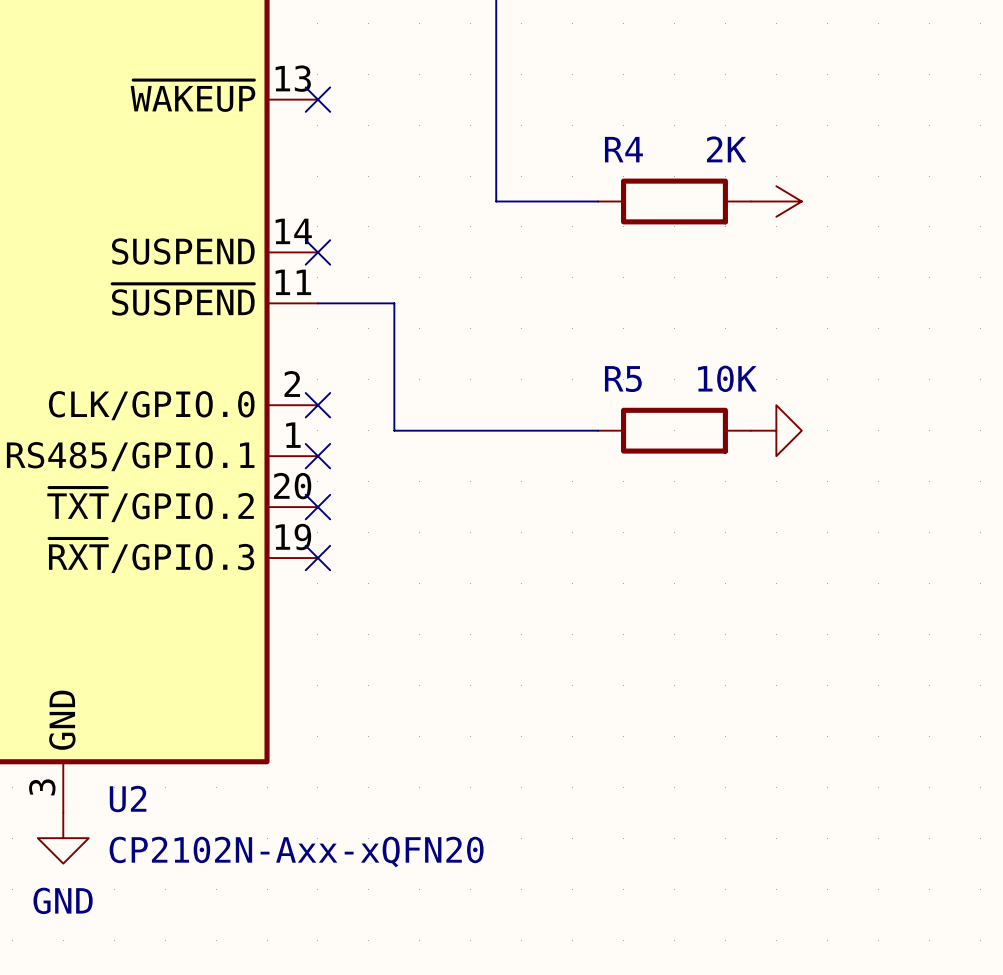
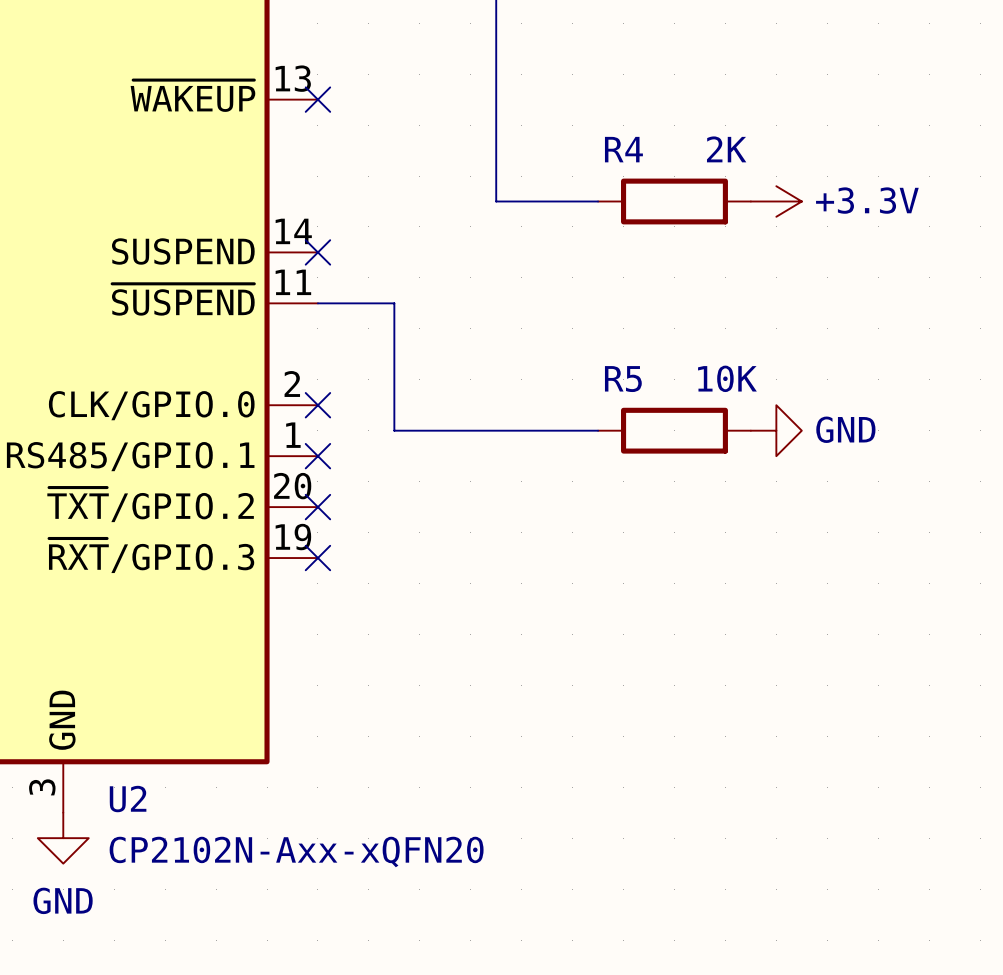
power symbol text: none -> +3.3V (867, 200)
power symbol text: none -> GND (845, 429)

